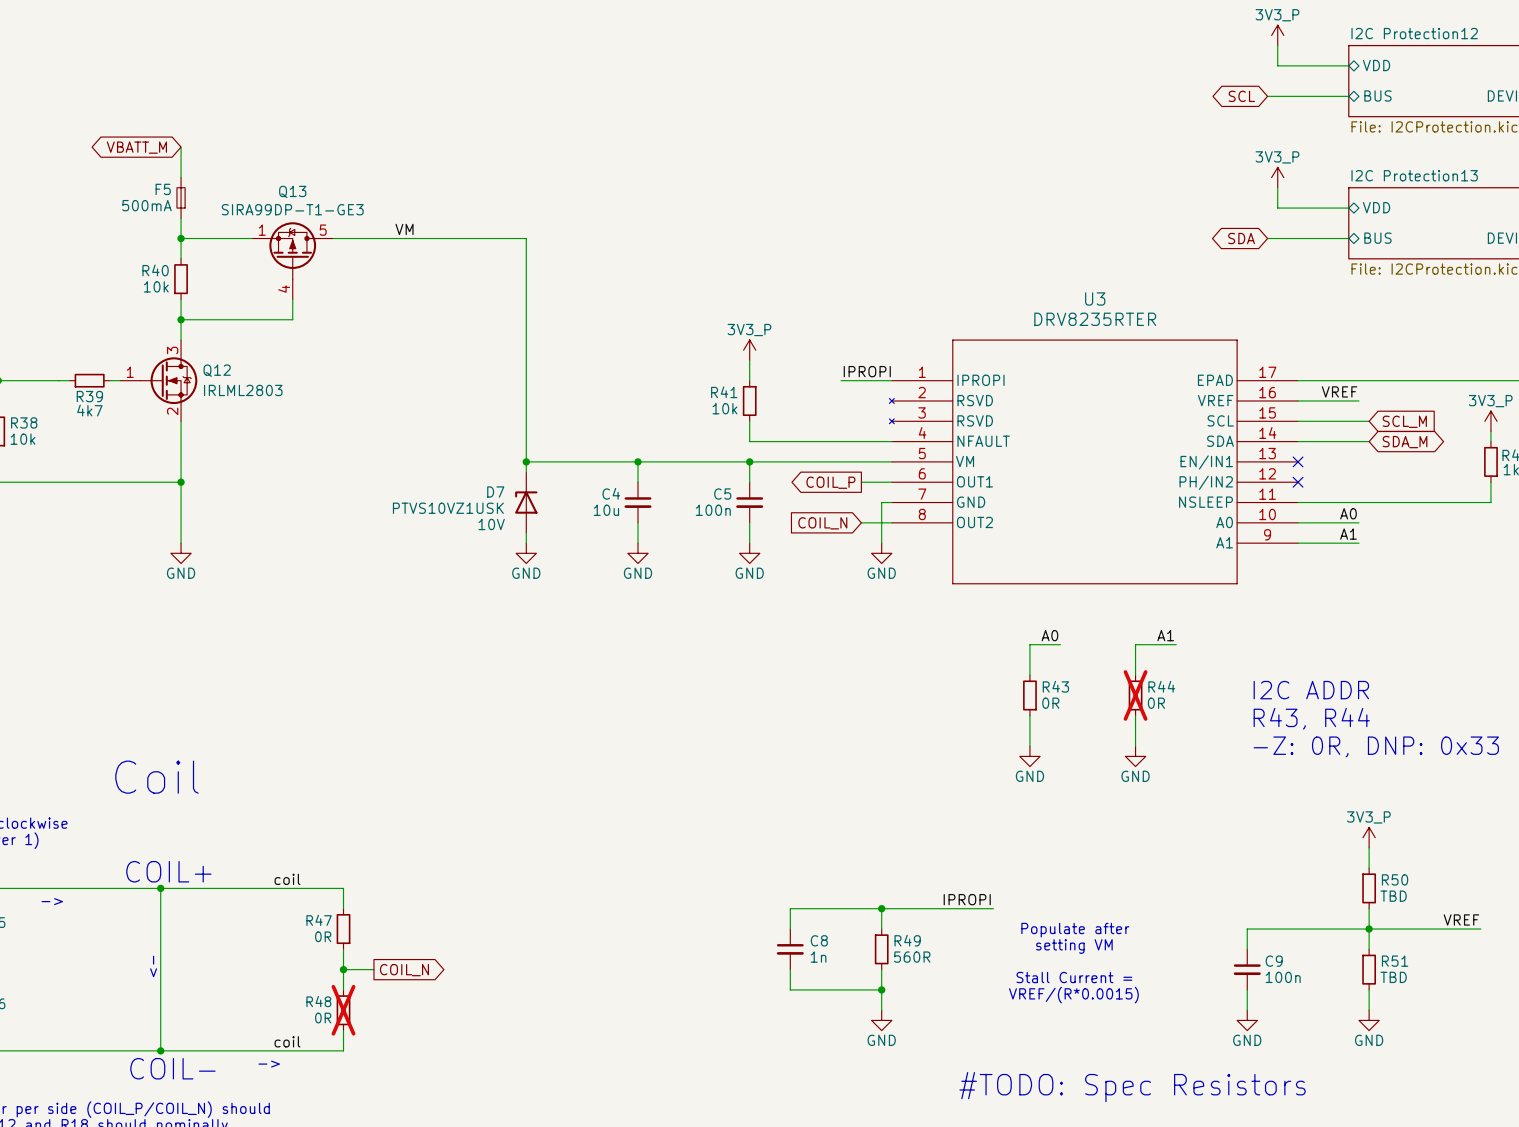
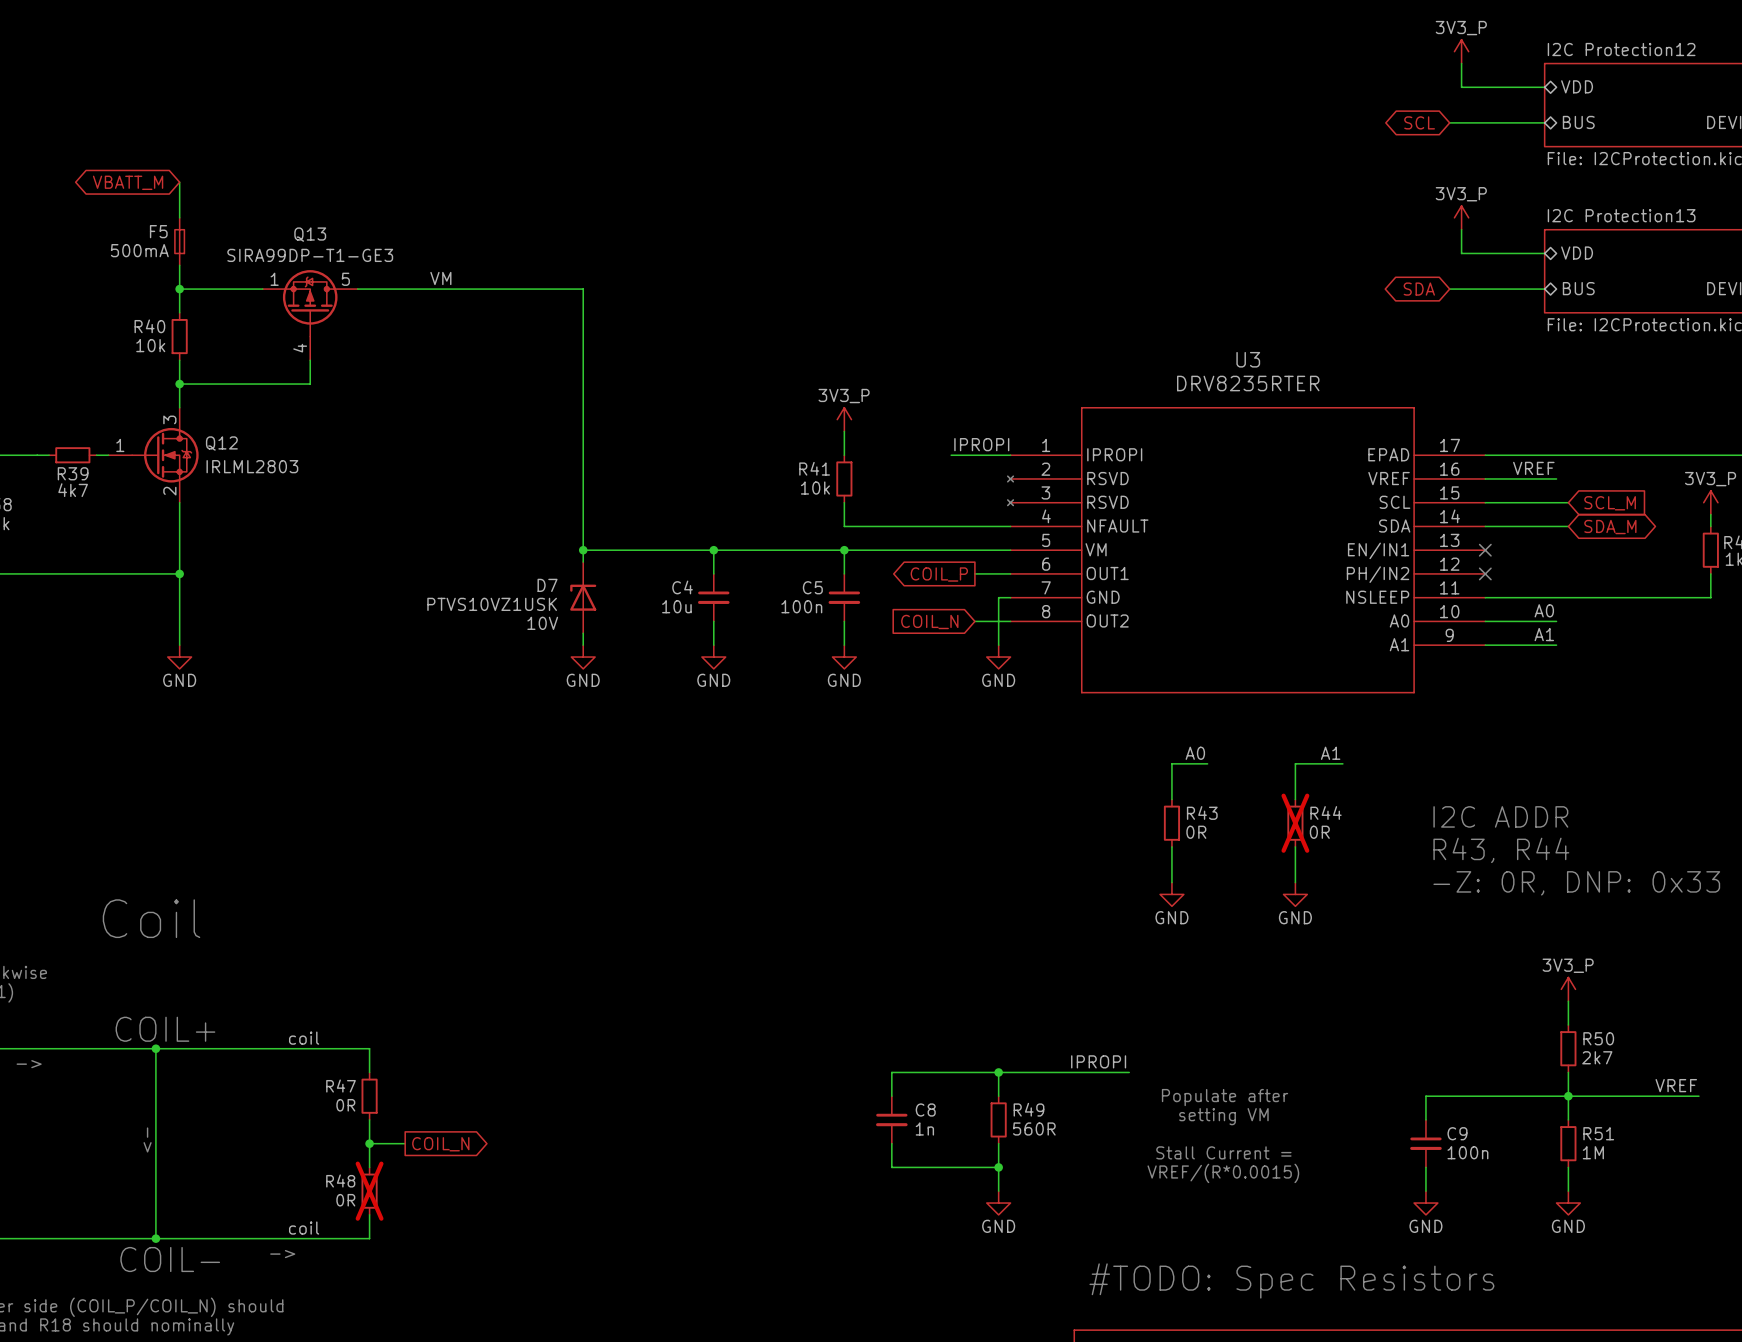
R50 value: TBD (1393, 896) -> 2k7 (1597, 1057)
R51 value: TBD (1393, 977) -> 1M (1593, 1152)

